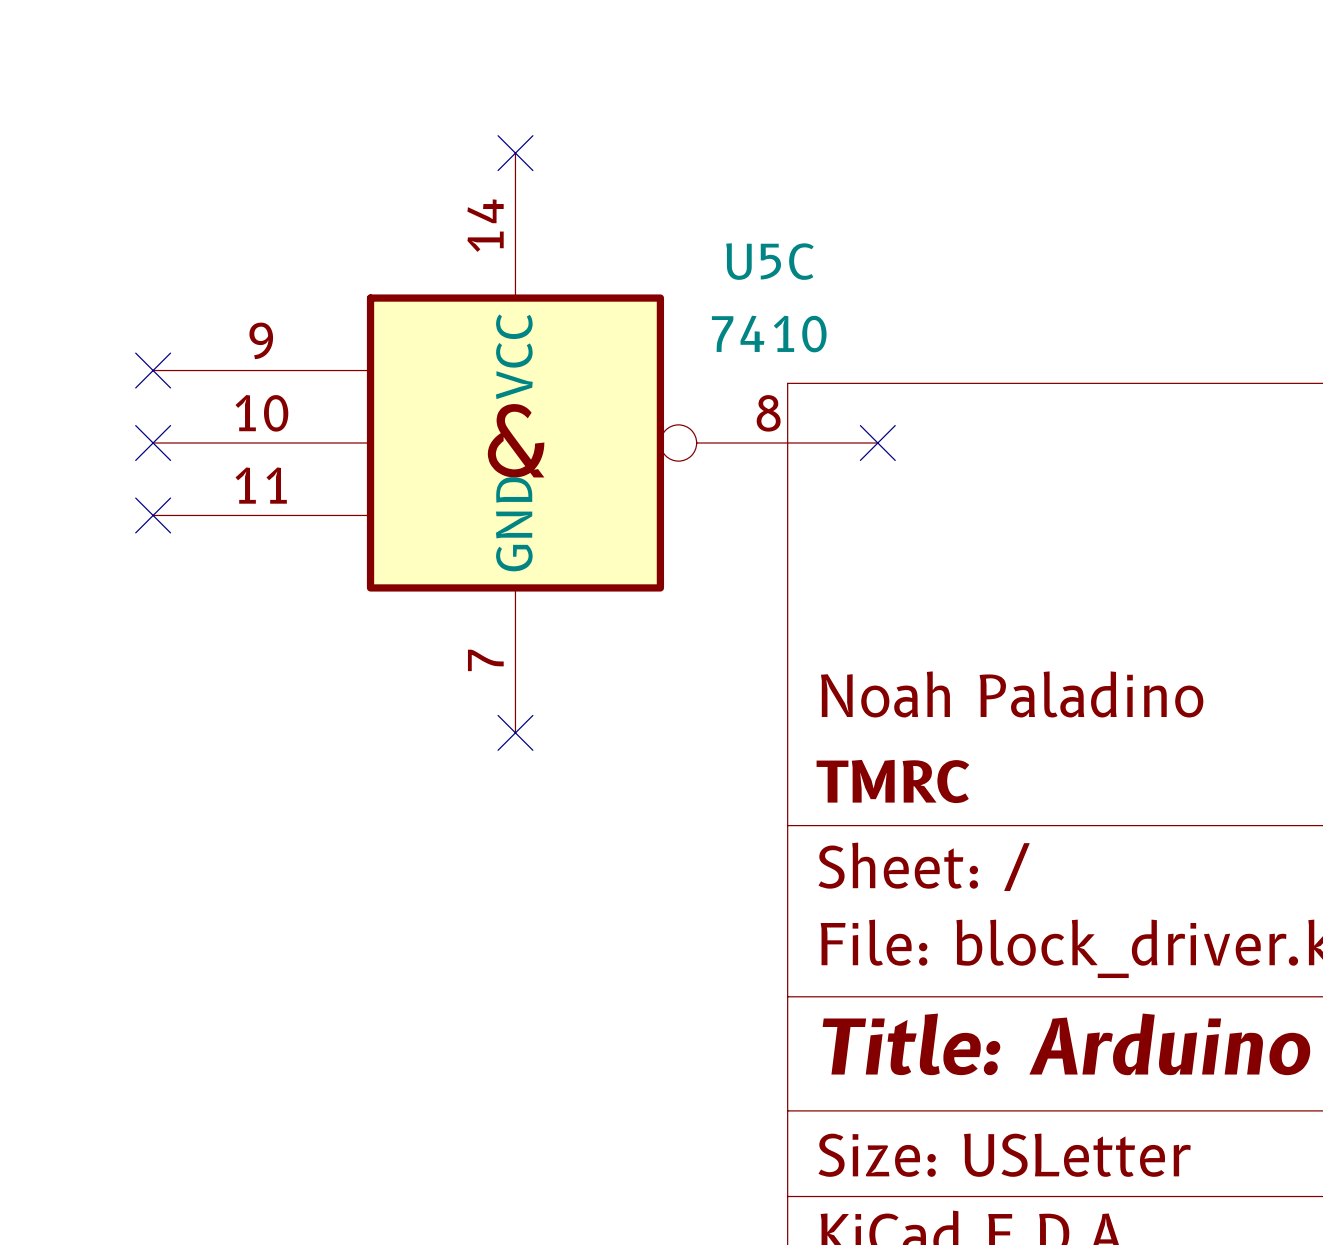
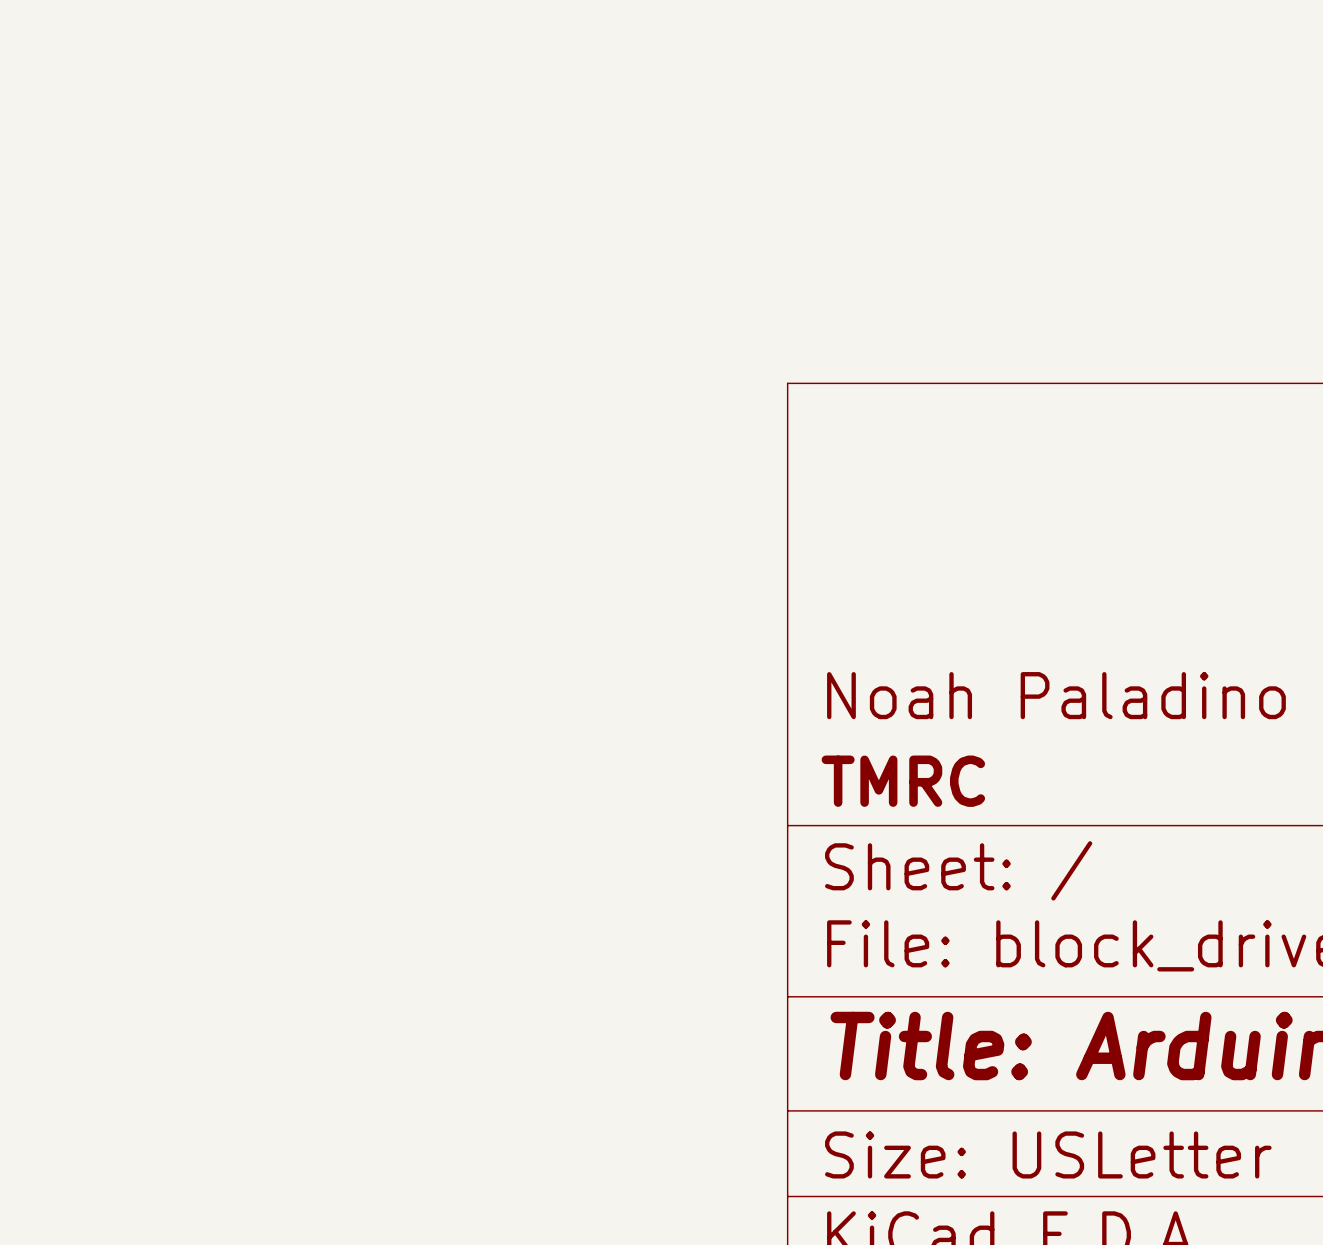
no-connect mark: (515, 153) -> none
no-connect mark: (153, 370) -> none
no-connect mark: (153, 443) -> none
U5C: 7410 (515, 443) -> none
no-connect mark: (877, 443) -> none
no-connect mark: (153, 515) -> none
no-connect mark: (515, 732) -> none

